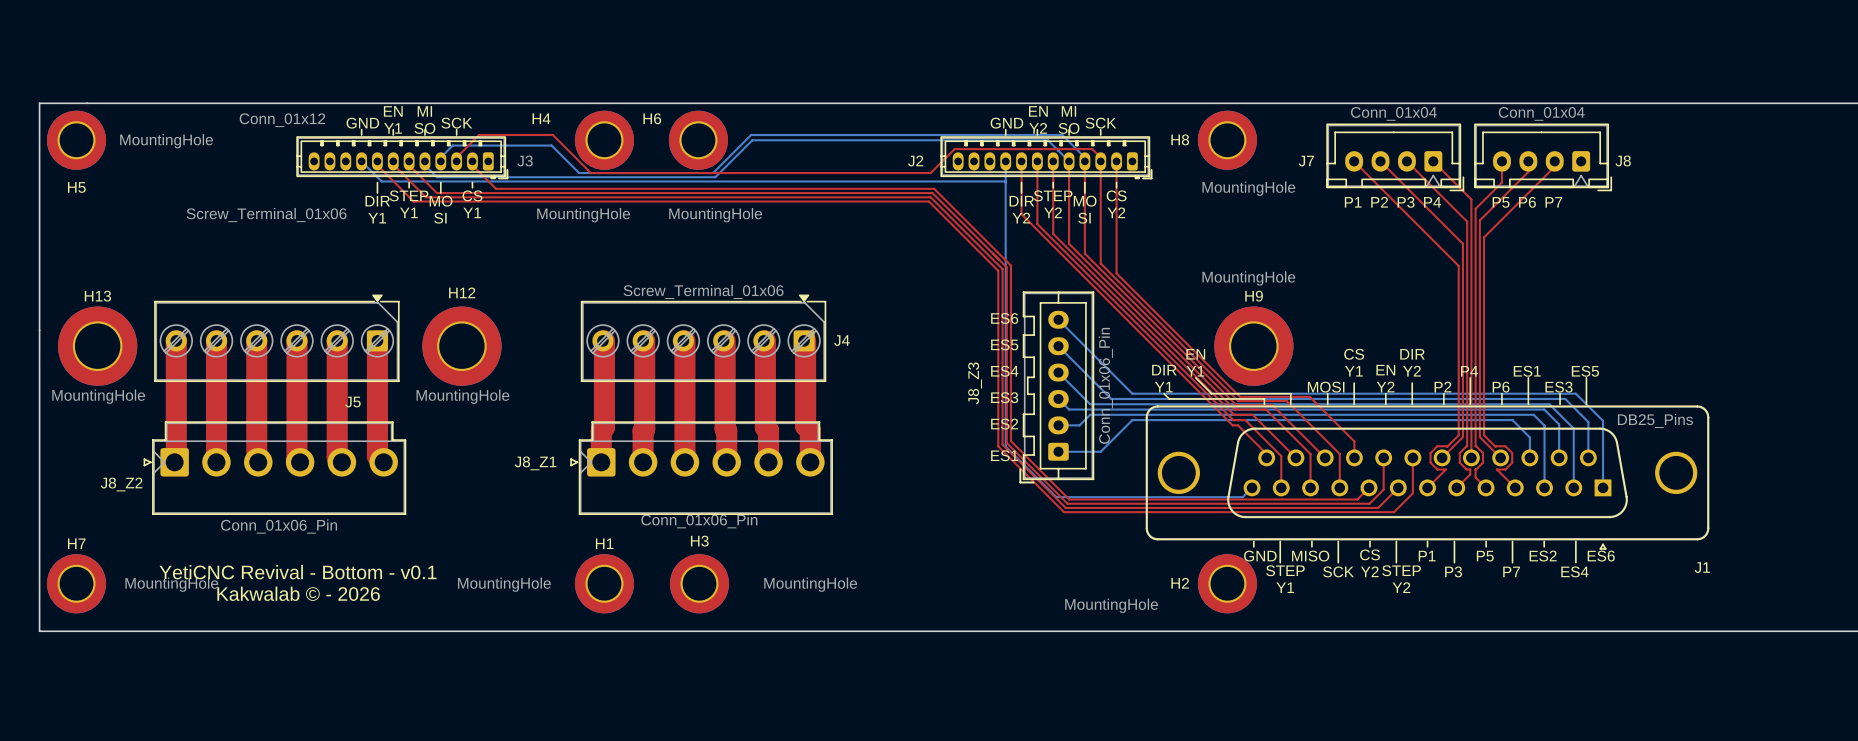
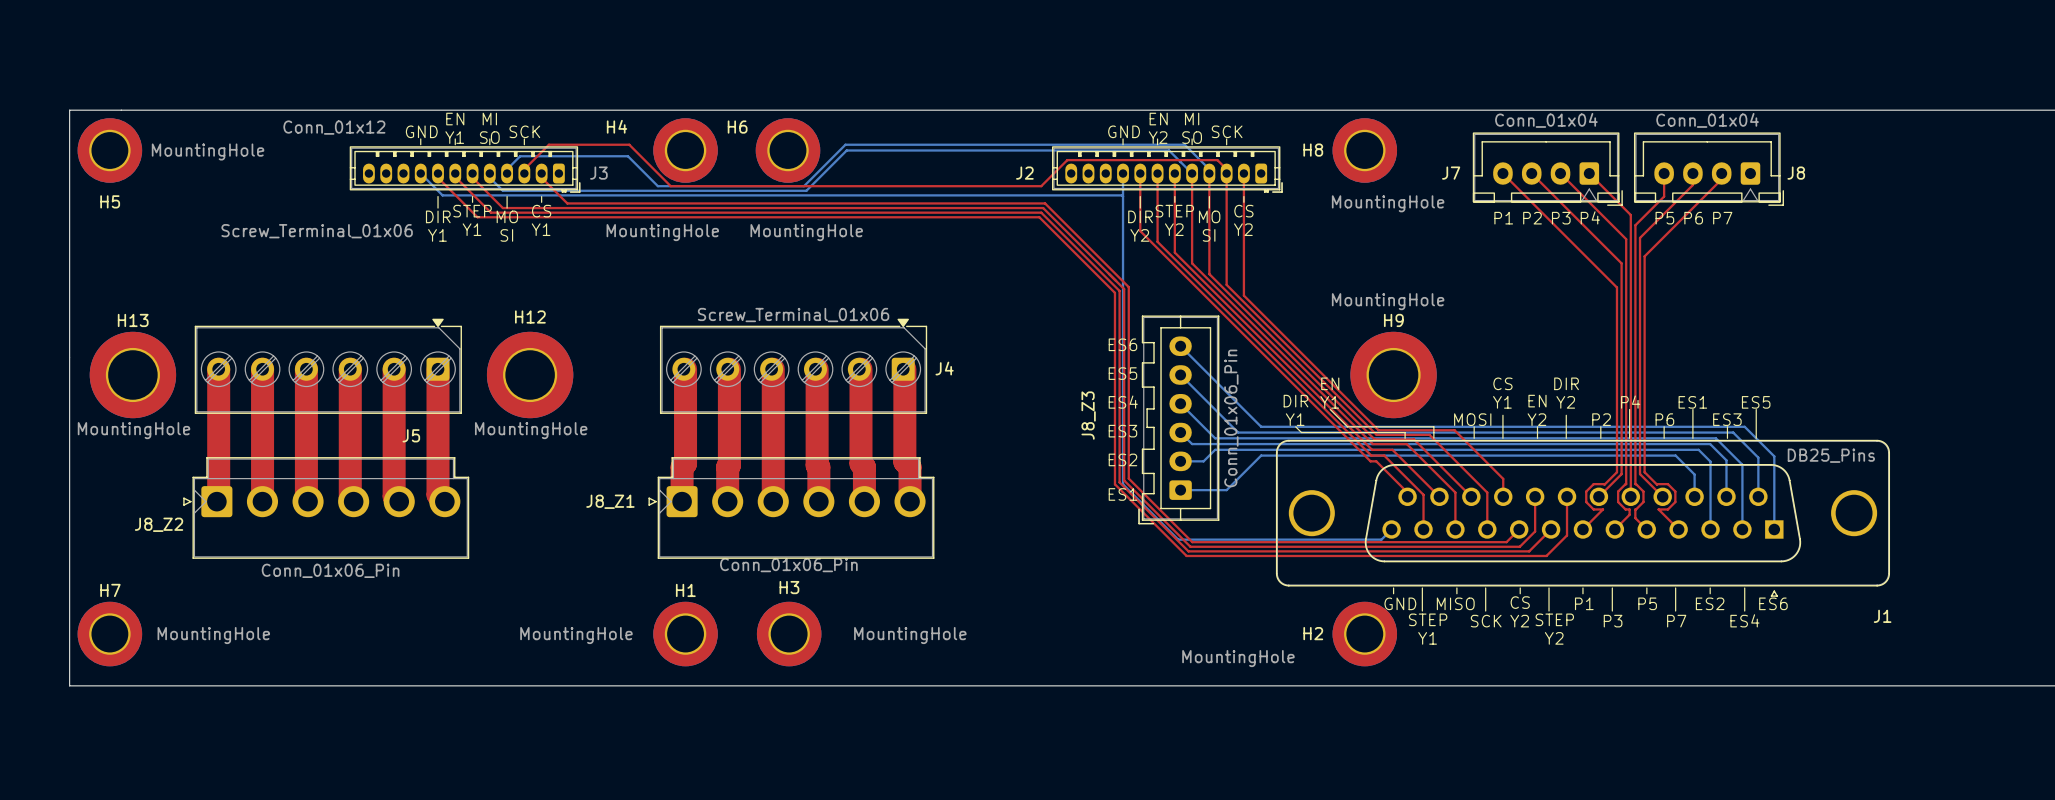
text: YetiCNC Revival - Bottom - v0.1 (298, 572) -> none
text: Kakwalab © - 2026 (298, 593) -> none

